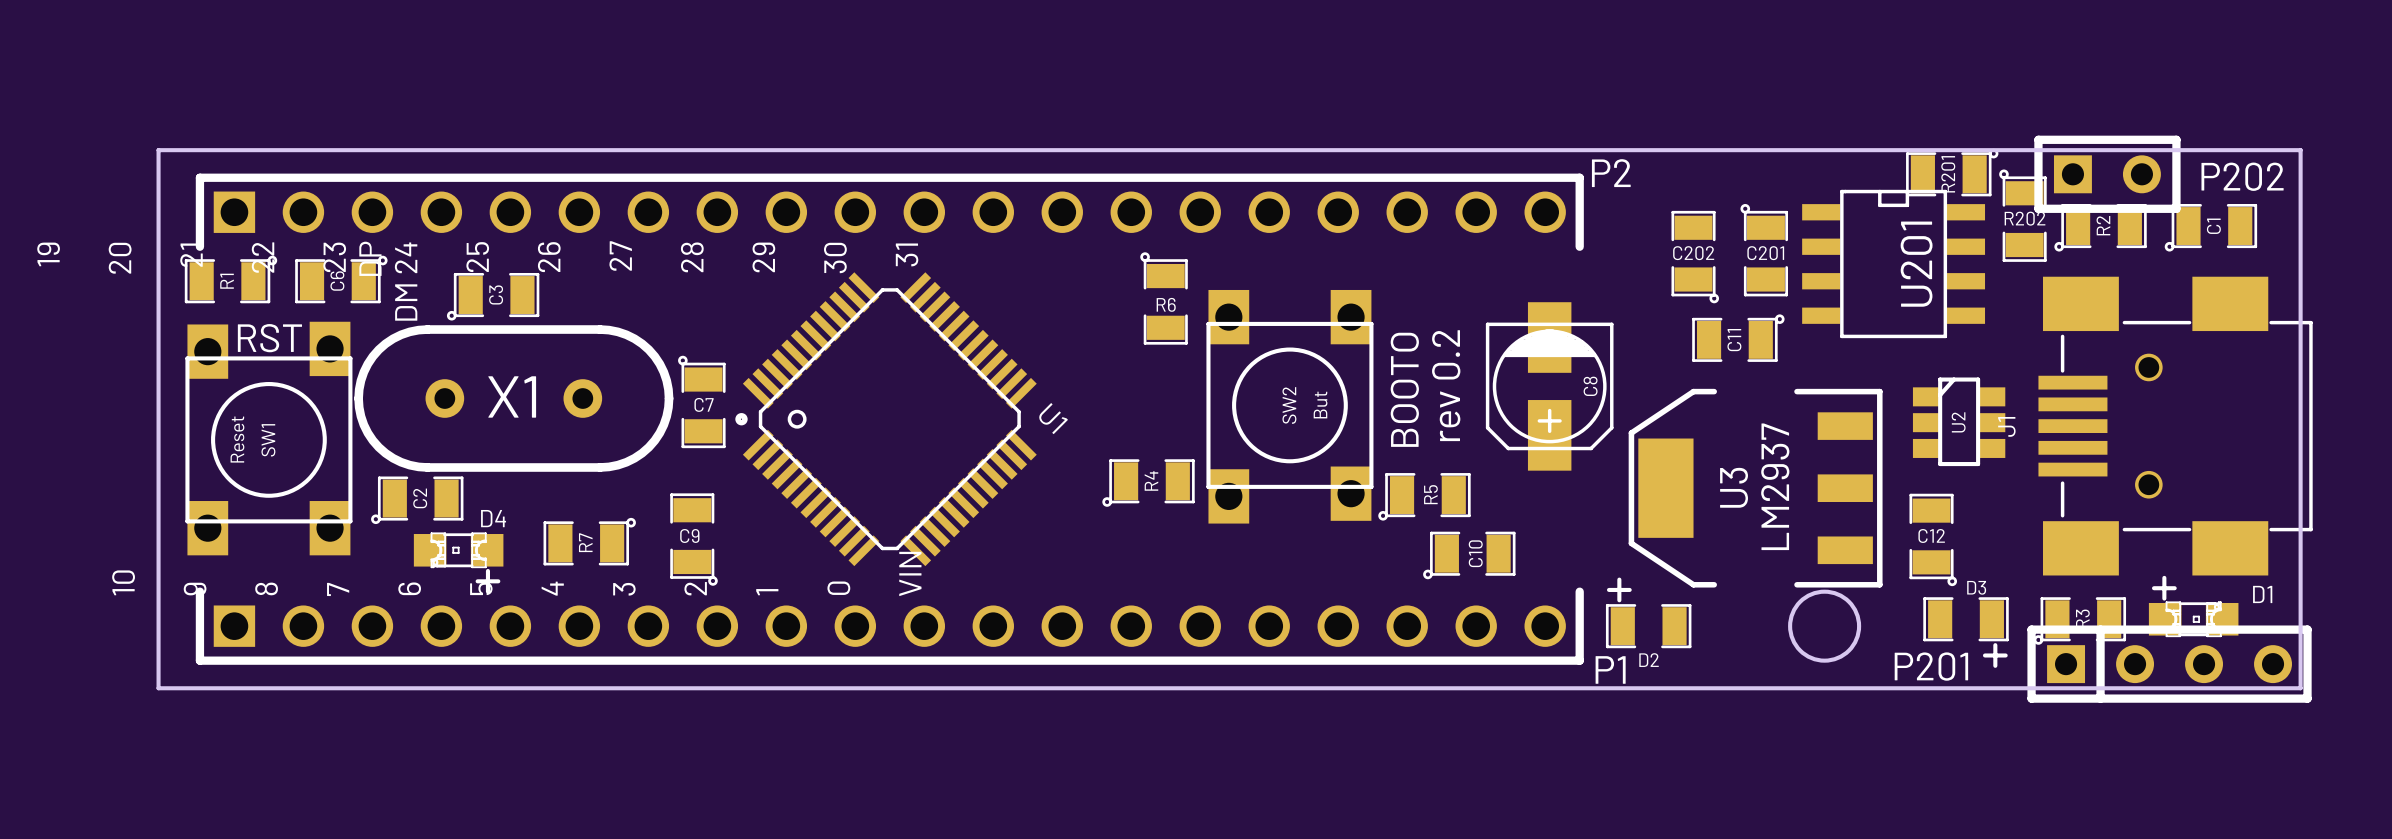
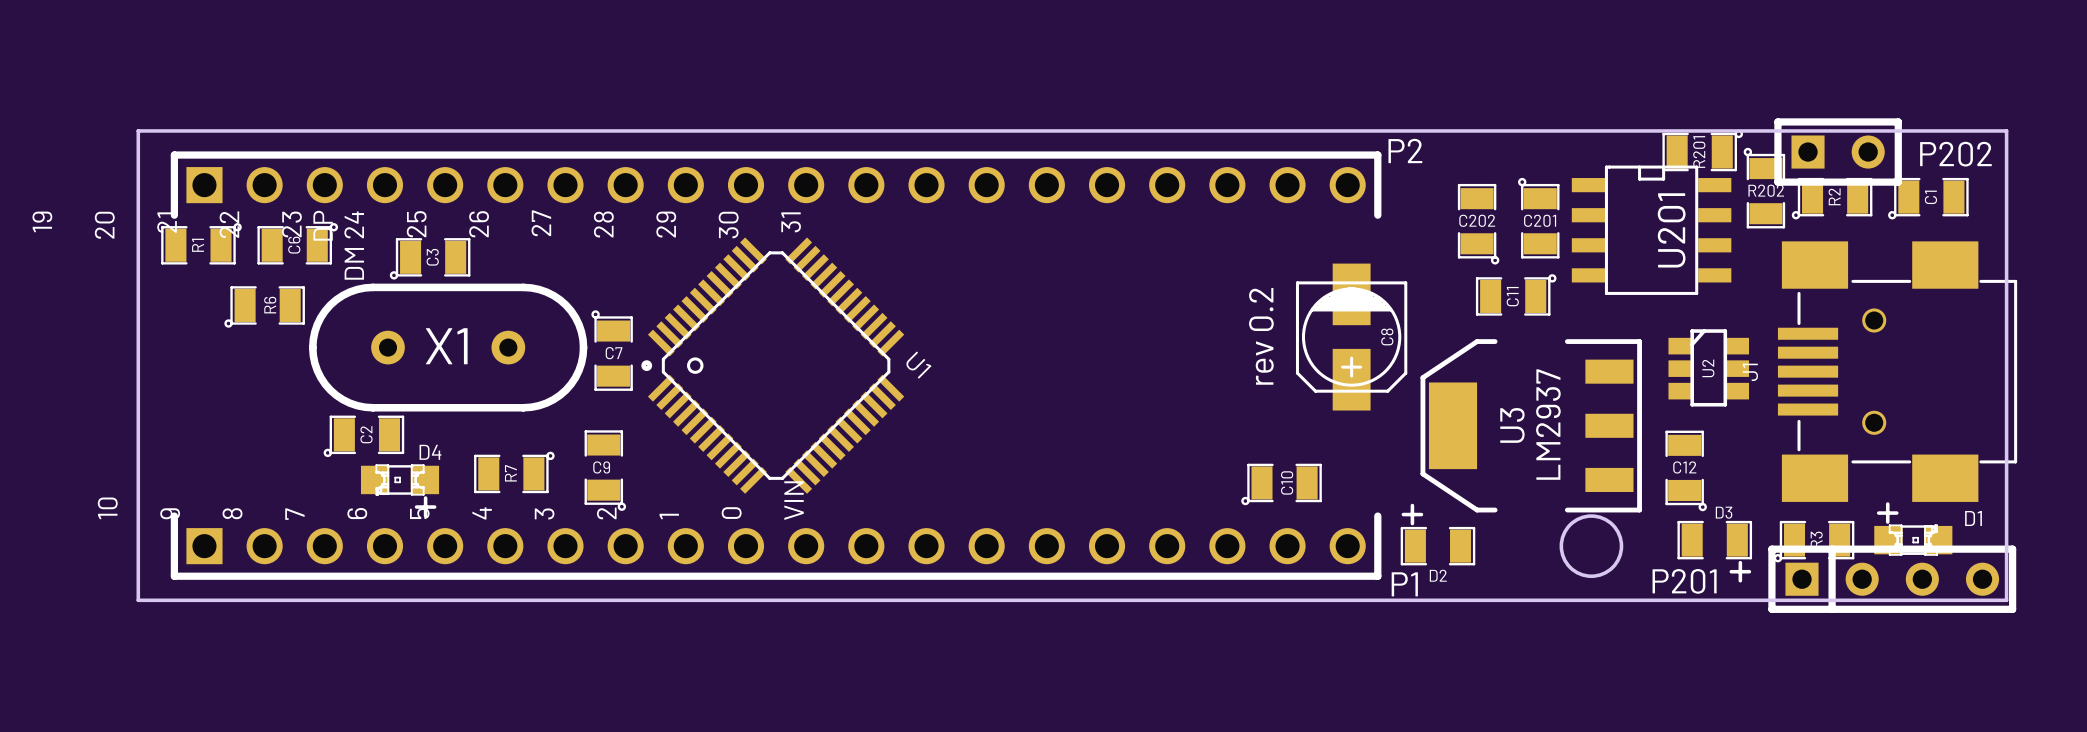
R6 rotation: 0° (1164, 298) -> 90° counterclockwise (264, 306)
R6 position: (1164, 298) -> (264, 306)
text: RST (269, 338) -> none
text: BOOTO (1404, 389) -> none
SW2: But (1289, 406) -> none
SW1: Reset (268, 438) -> none
R4: (1148, 483) -> none
R5: (1424, 496) -> none

